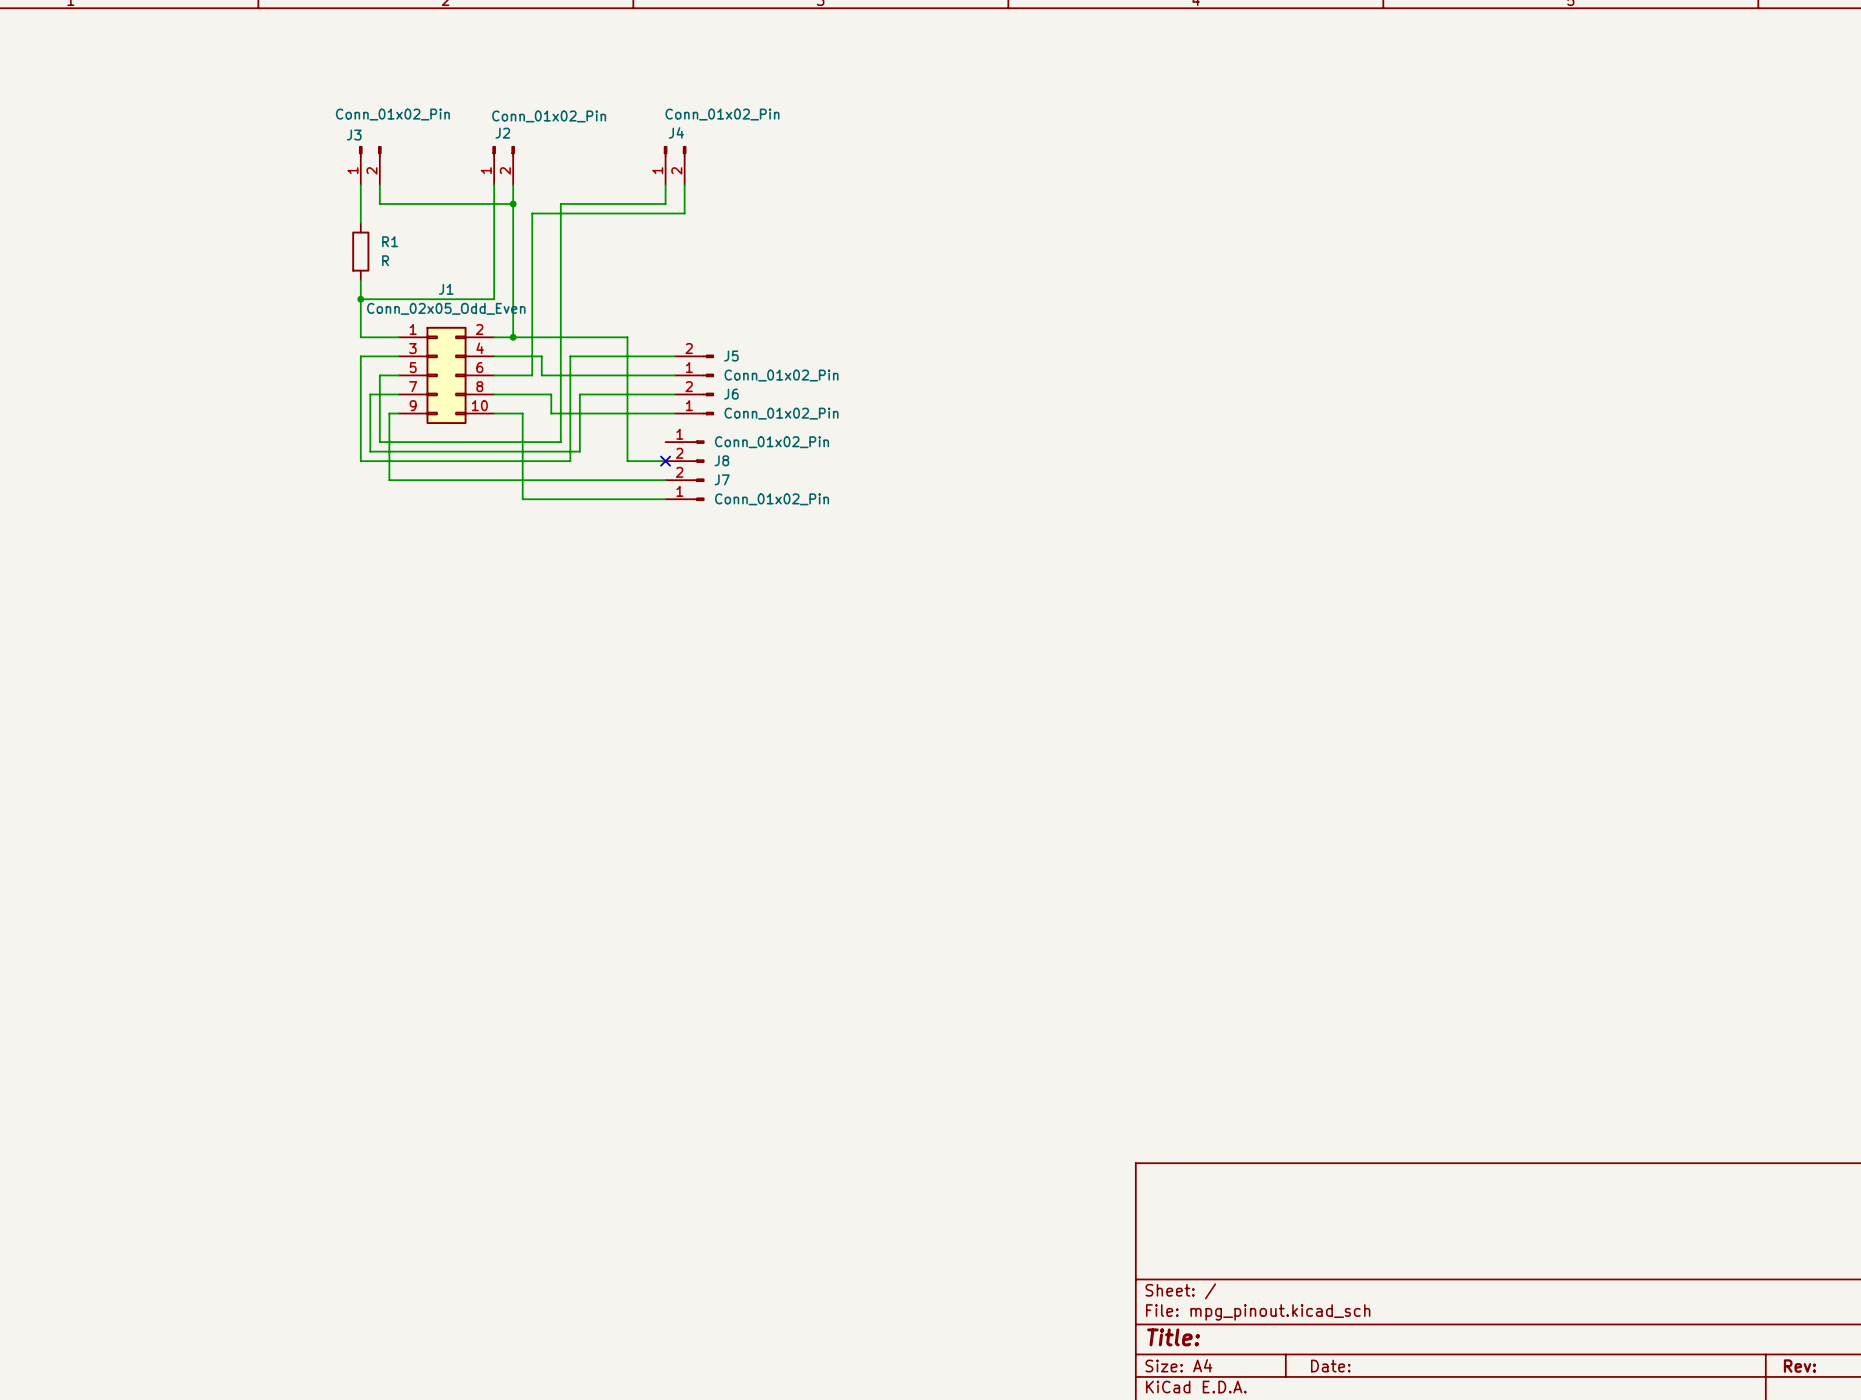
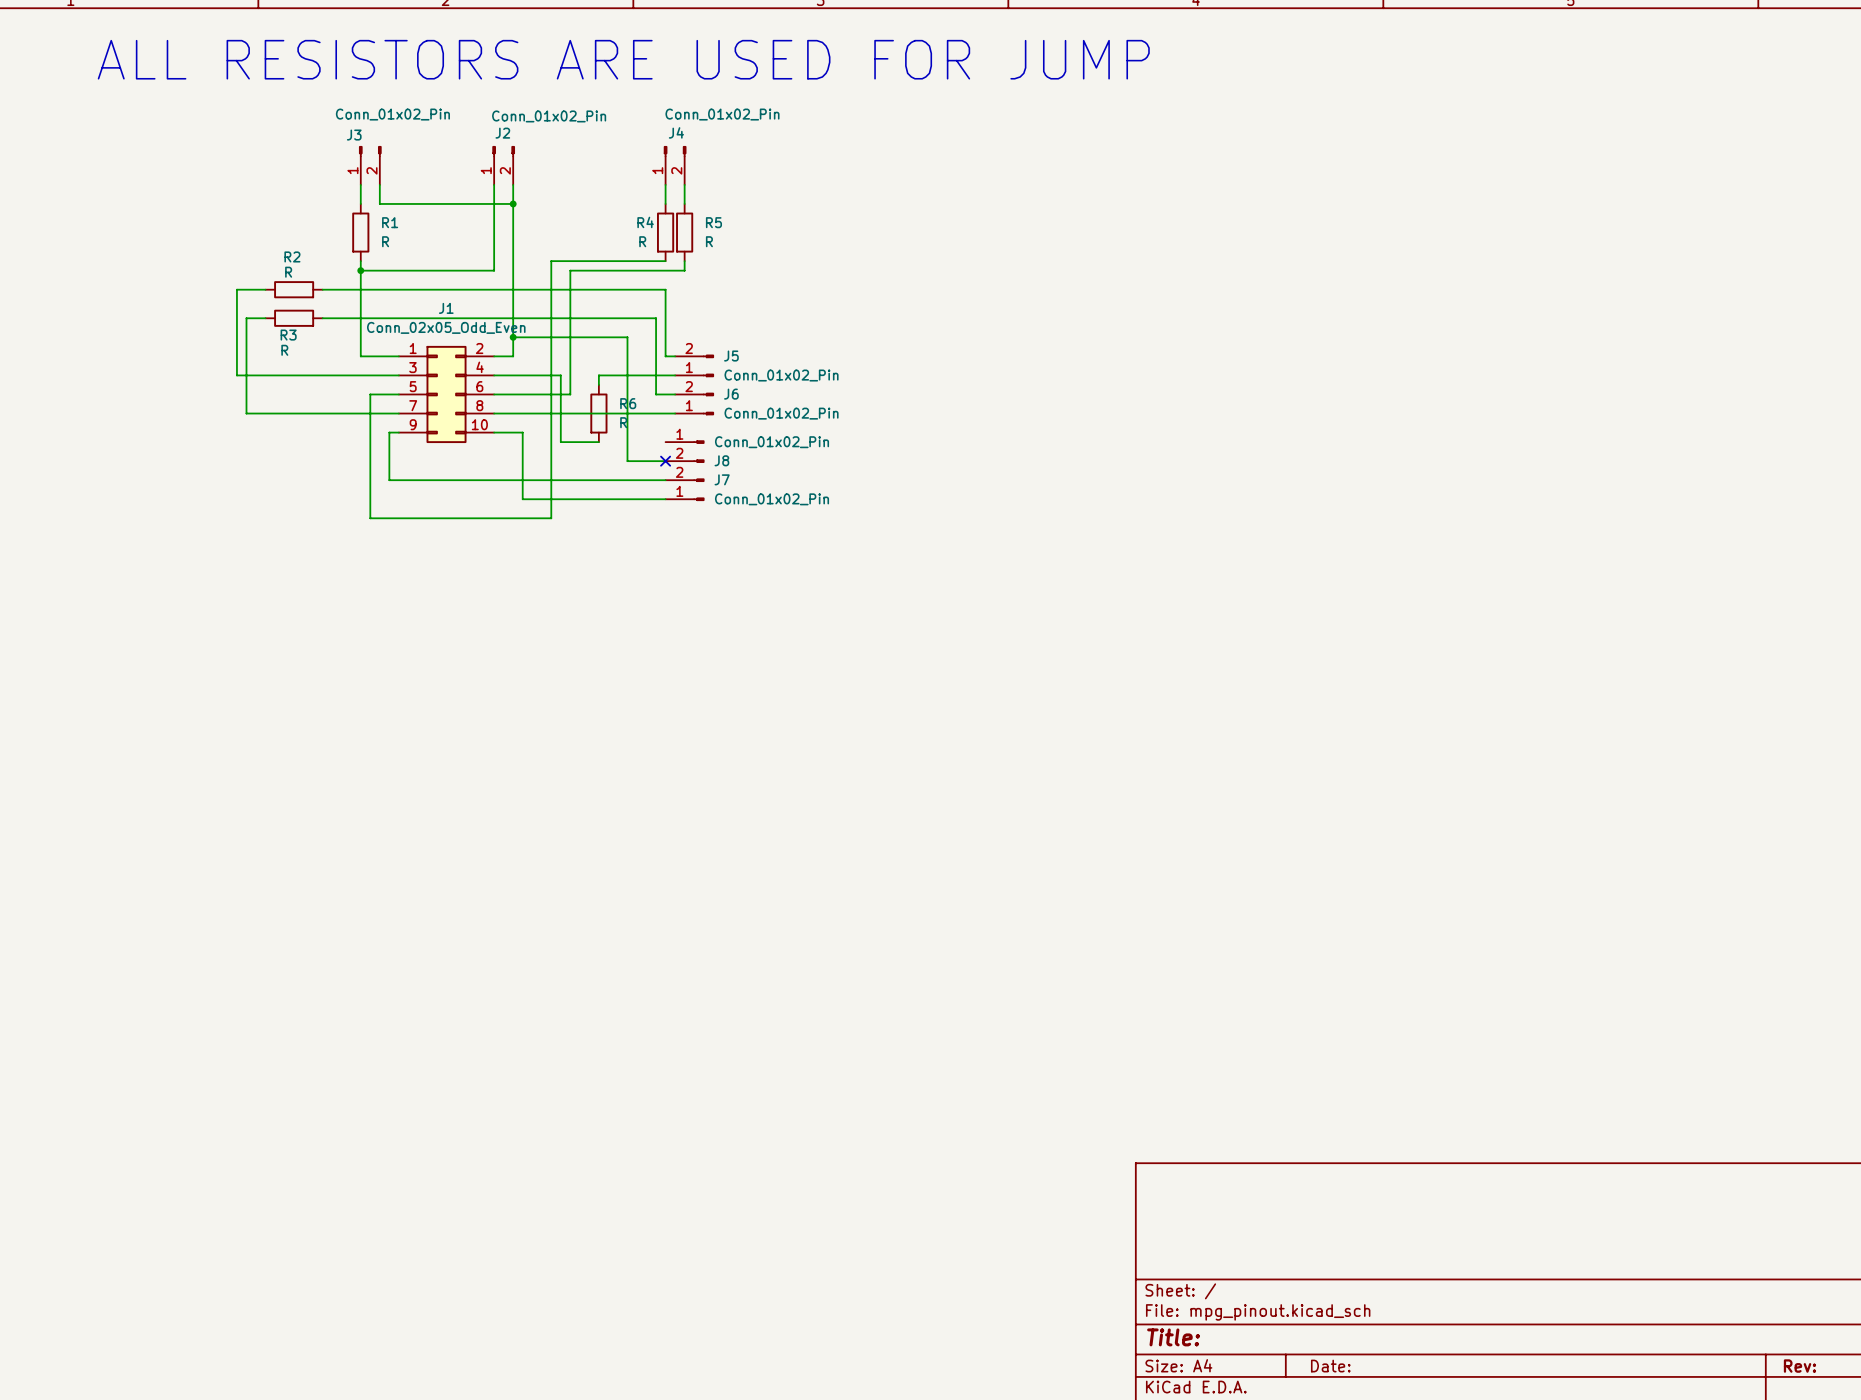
text: none -> ALL RESISTORS ARE USED FOR JUMP (623, 59)
wire: (665, 203) (560, 203) (560, 375) (598, 375) -> (598, 384) (598, 375)
wire: (684, 203) (684, 213) (532, 213) (532, 375) -> none
R4: none -> R (665, 232)
R5: none -> R (684, 232)
R1 position: (360, 251) -> (360, 232)
wire: (494, 270) (494, 299) (360, 299) -> (494, 270) (360, 270)
wire: none -> (265, 289) (236, 289) (236, 375) (379, 375)
R2: none -> R (294, 289)
wire: none -> (322, 289) (665, 289) (665, 356)
junction position: (360, 299) -> (360, 270)
wire: none -> (265, 318) (246, 318) (246, 413) (389, 413)
R3: none -> R (294, 318)
wire: none -> (322, 318) (656, 318) (656, 394)
wire: (360, 337) (398, 337) -> (360, 337) (360, 356)
wire: (494, 337) (513, 337) -> (513, 356) (513, 337)
wire: (360, 356) (360, 461) (570, 461) (570, 394) -> (665, 261) (551, 261) (551, 394) (570, 394)
wire: (513, 356) (541, 356) (541, 375) -> (532, 375) (541, 375)
wire: (570, 356) (665, 356) -> (570, 356) (570, 270) (684, 270) (684, 261)
wire: (379, 375) (379, 442) (560, 442) -> (598, 442) (560, 442)
J1 position: (446, 375) -> (446, 394)
wire: (656, 394) (579, 394) (579, 451) (370, 451) -> (522, 413) (551, 413) (551, 518) (370, 518) (370, 451)
wire: (389, 413) (389, 432) -> (398, 432) (389, 432)
wire: (522, 413) (522, 432) -> (494, 432) (522, 432)
R6: none -> R (598, 413)

